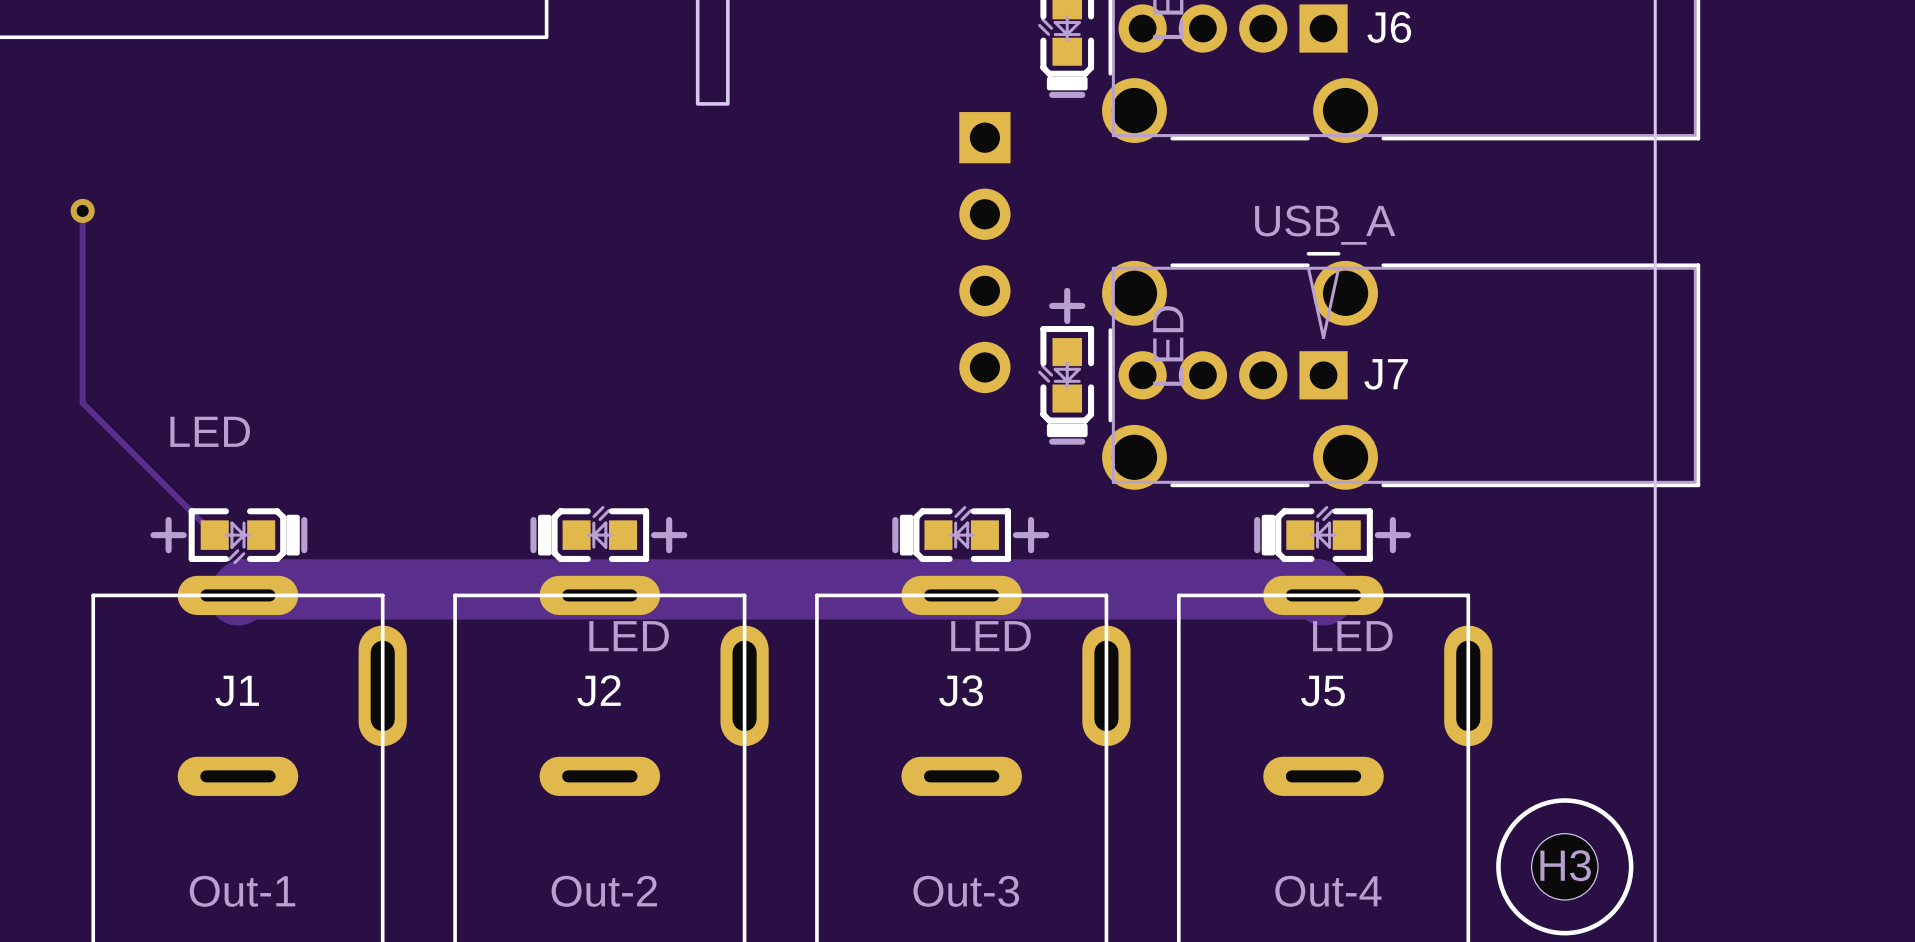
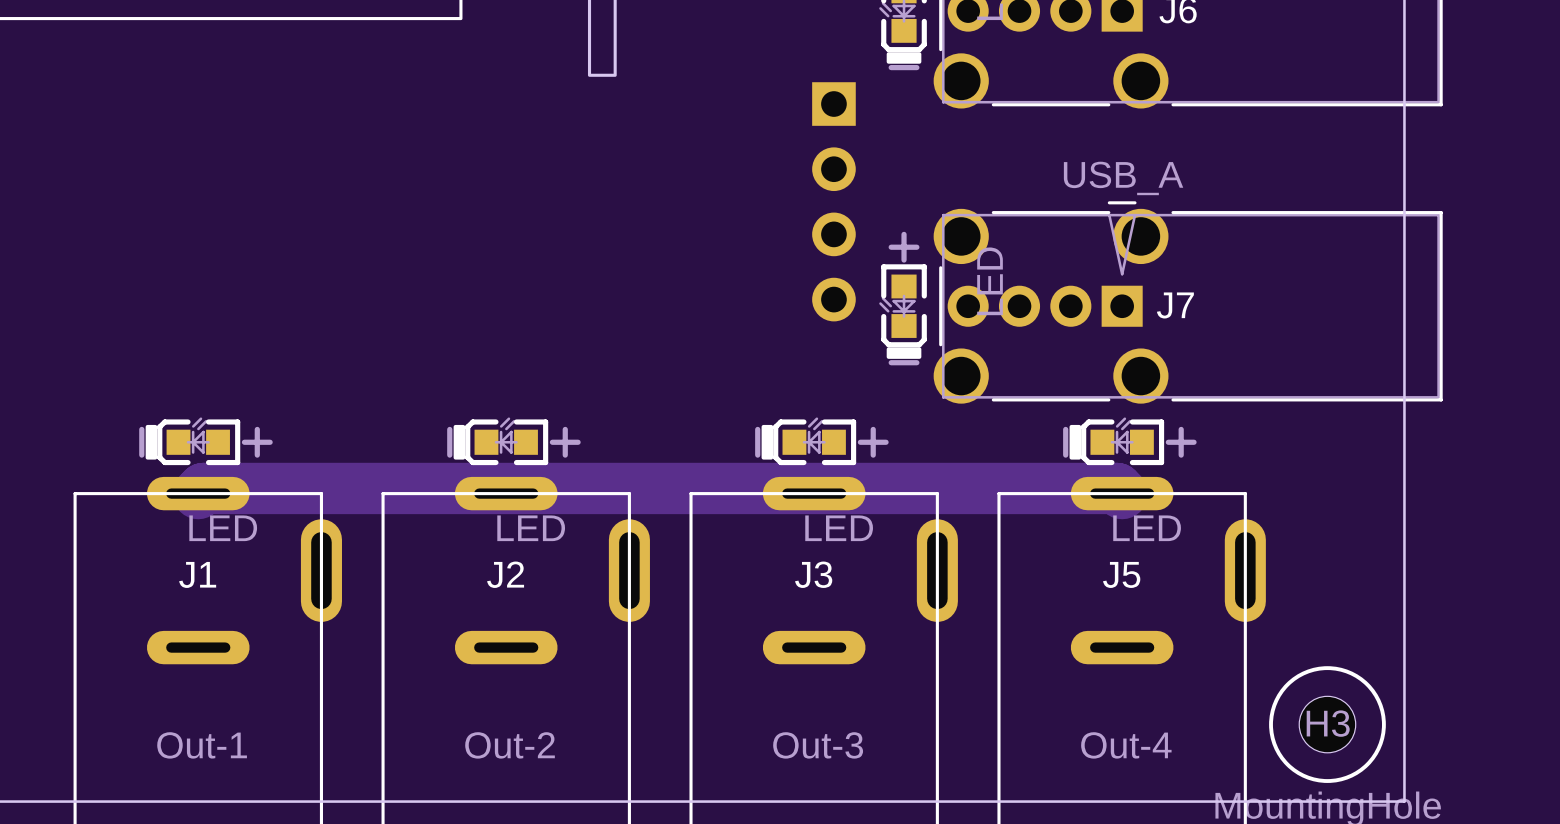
track: (82, 210) (82, 403) (214, 535) -> none
via: (82, 210) -> none
part rotation: 0° (228, 536) -> 180° (205, 441)

